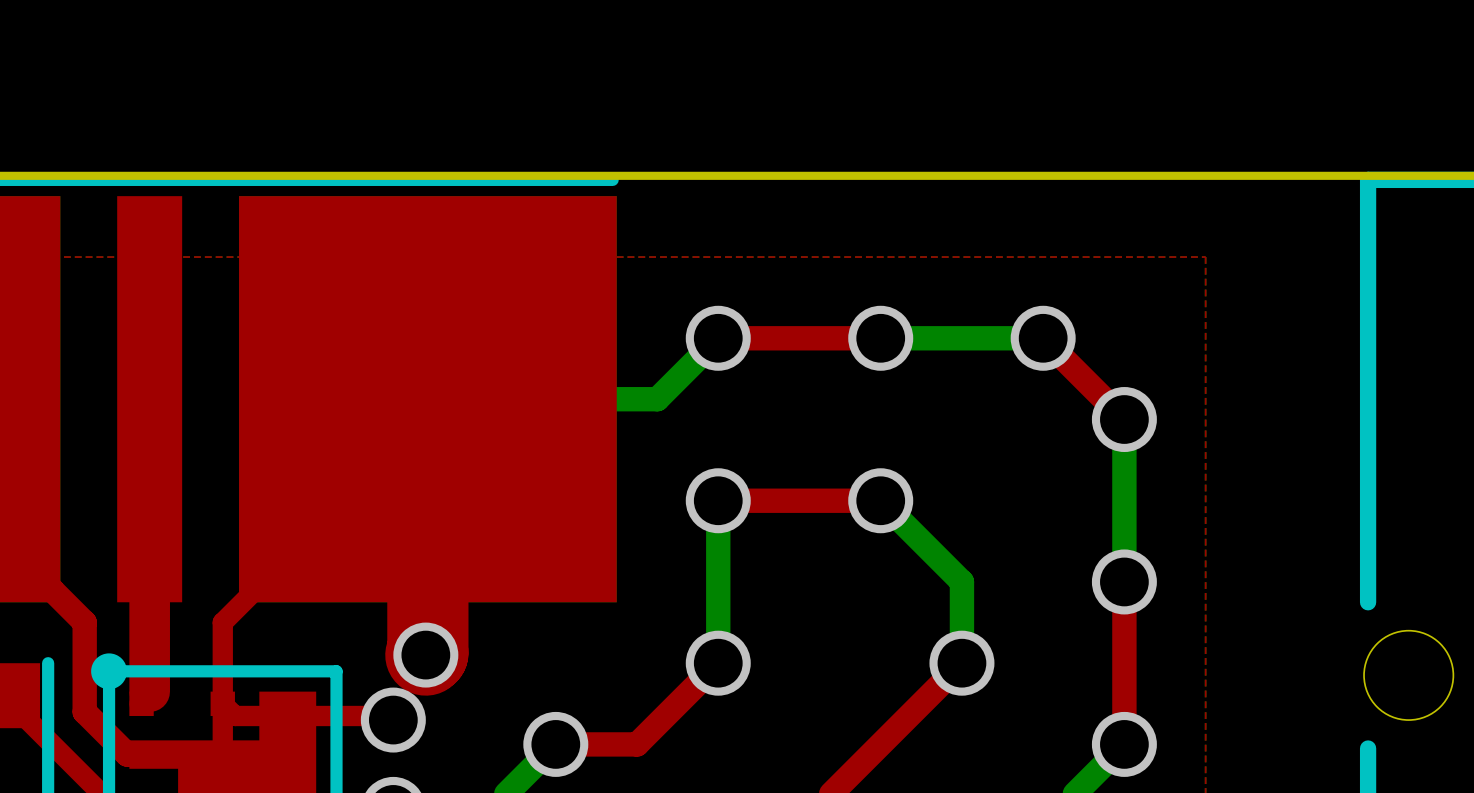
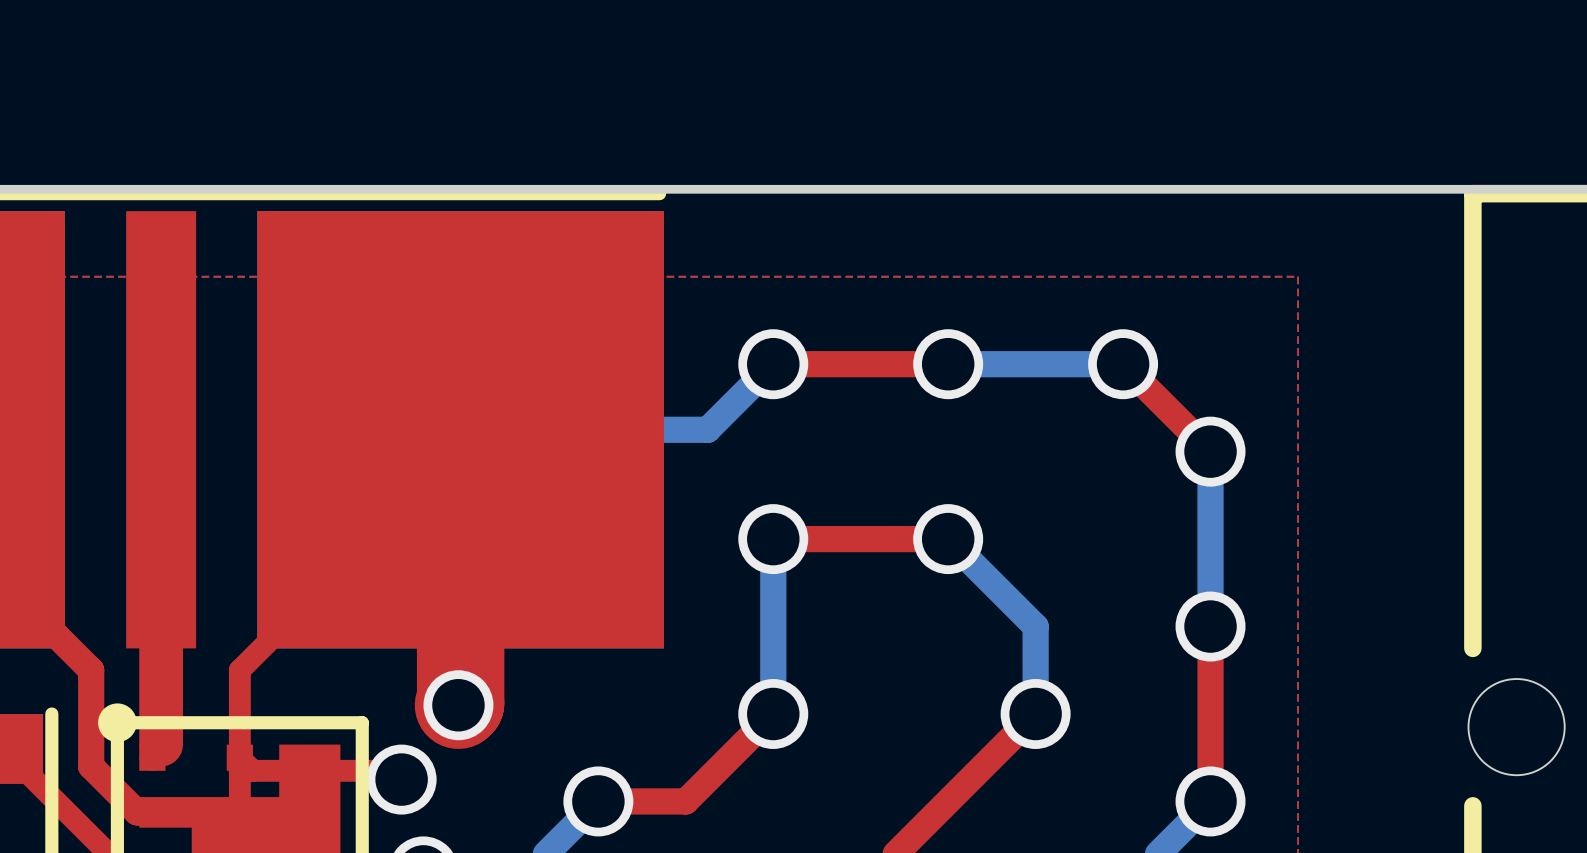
via position: (393, 720) -> (401, 779)

